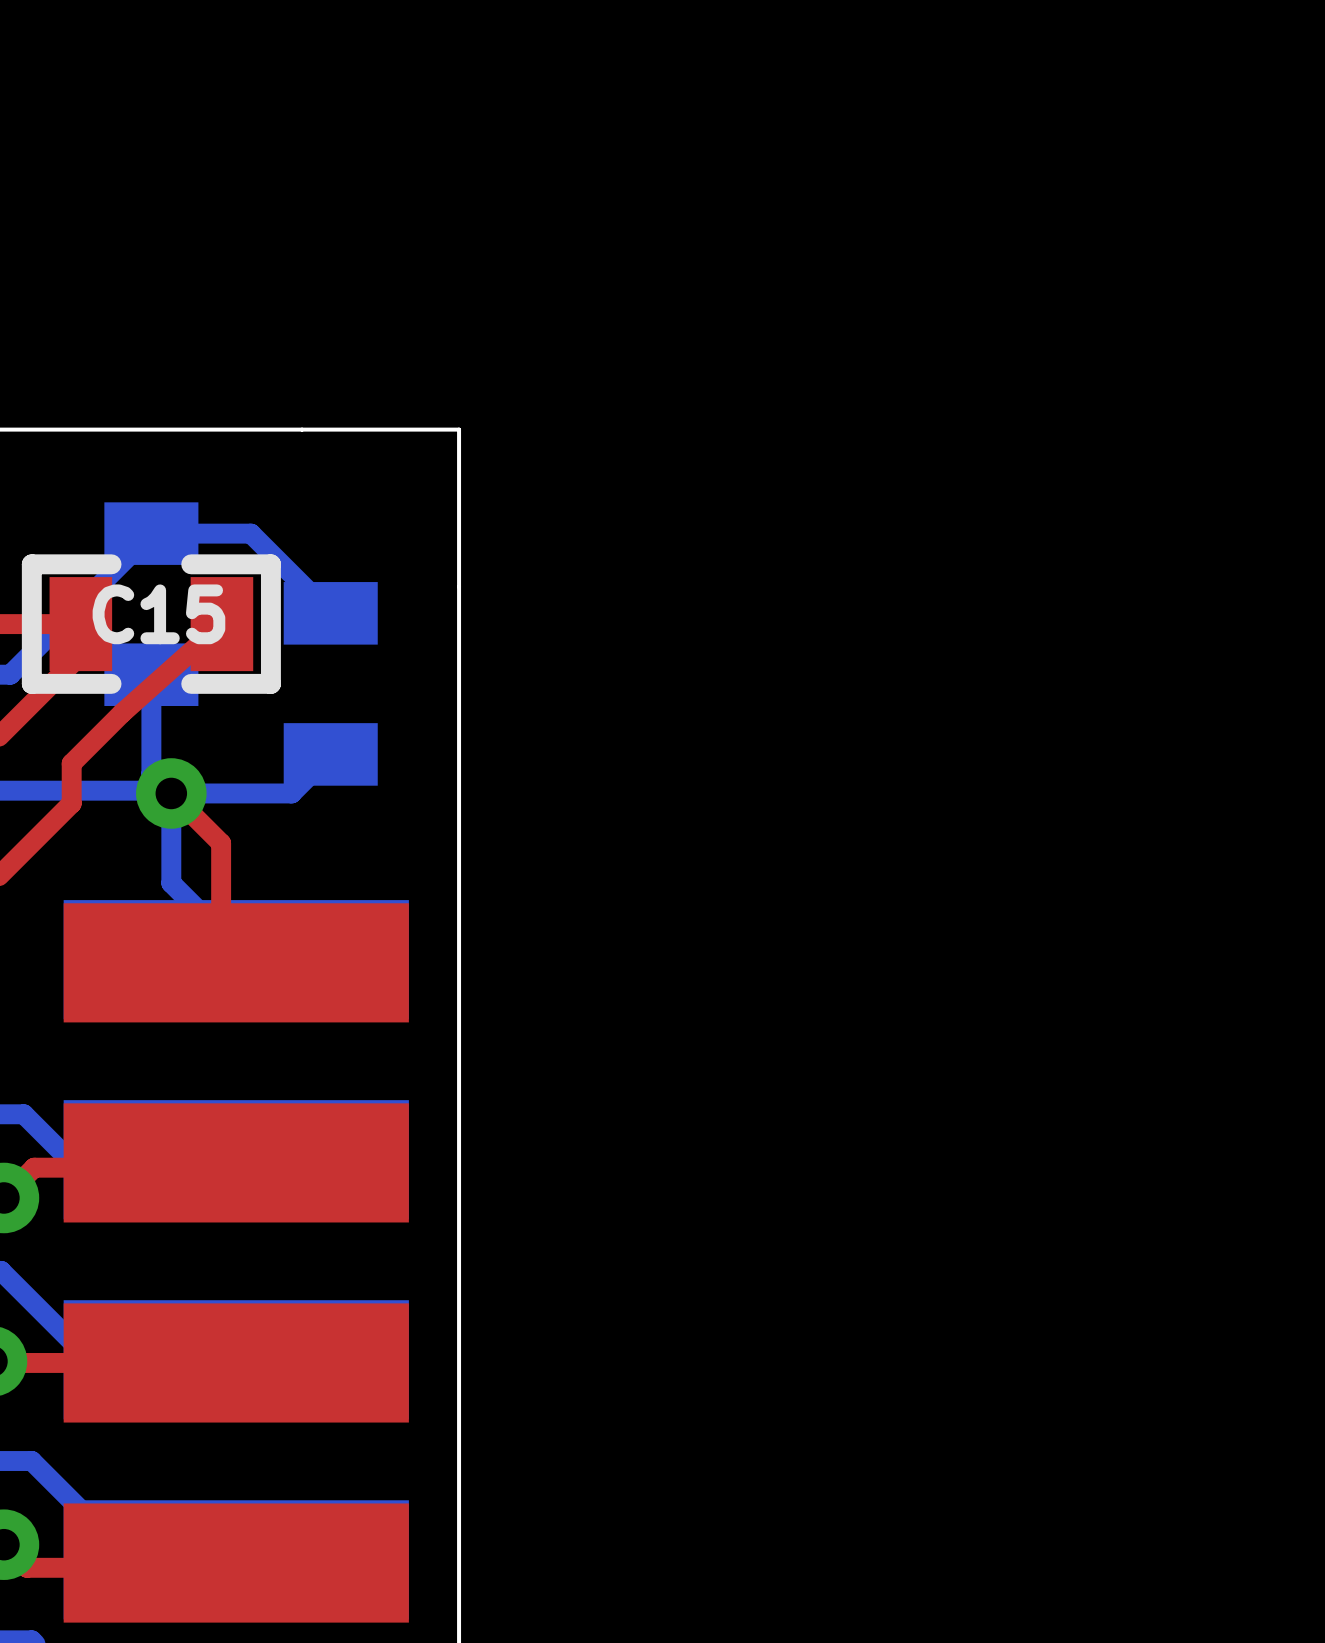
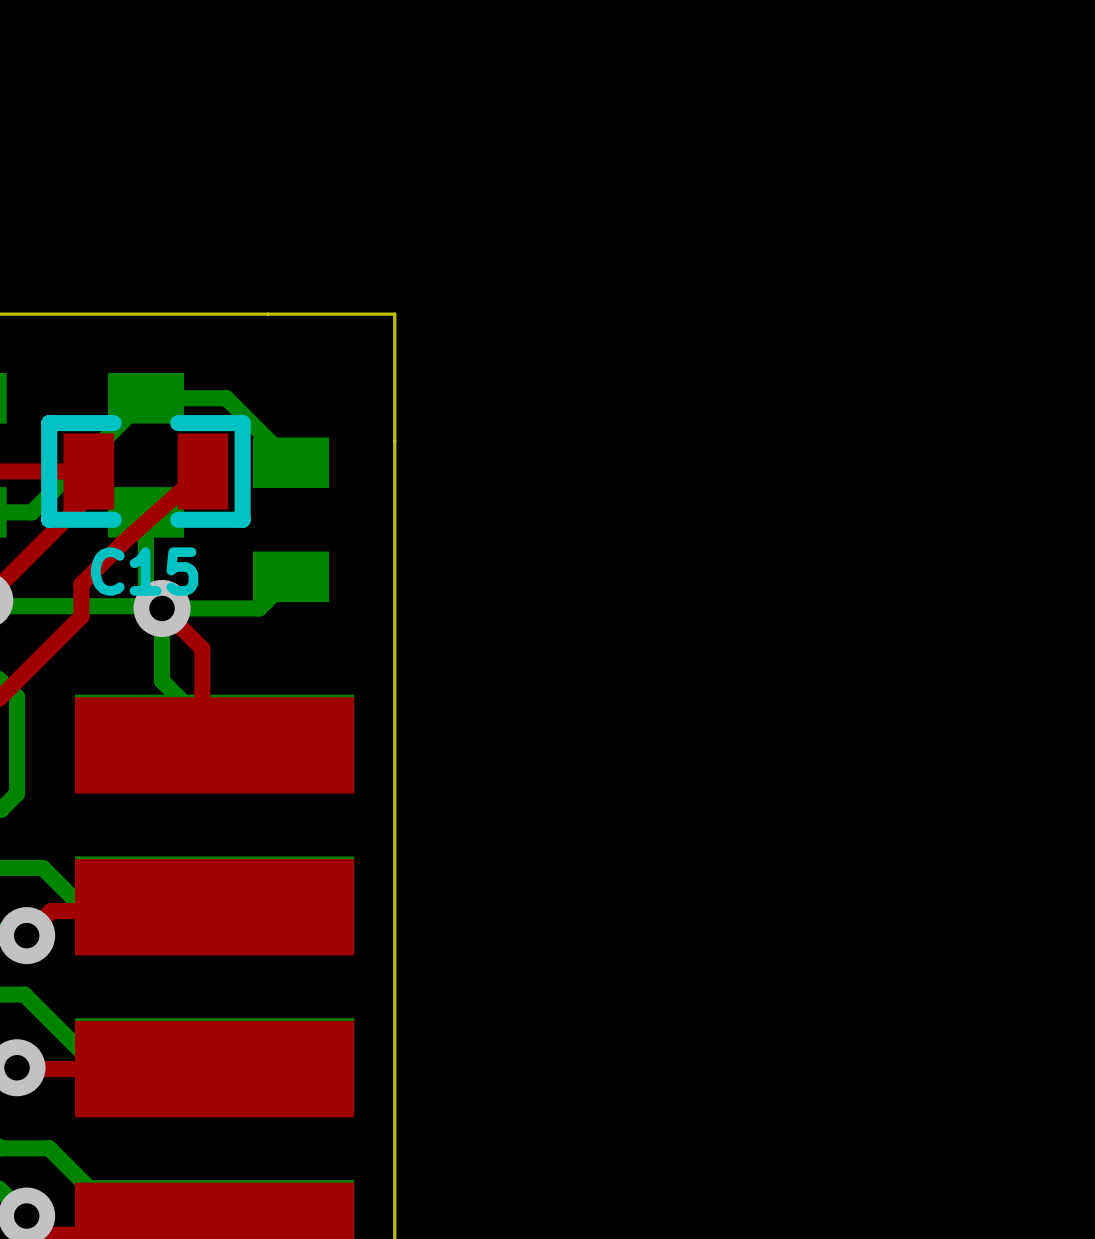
C15 name position: C15 (158, 614) -> C15 (144, 571)

